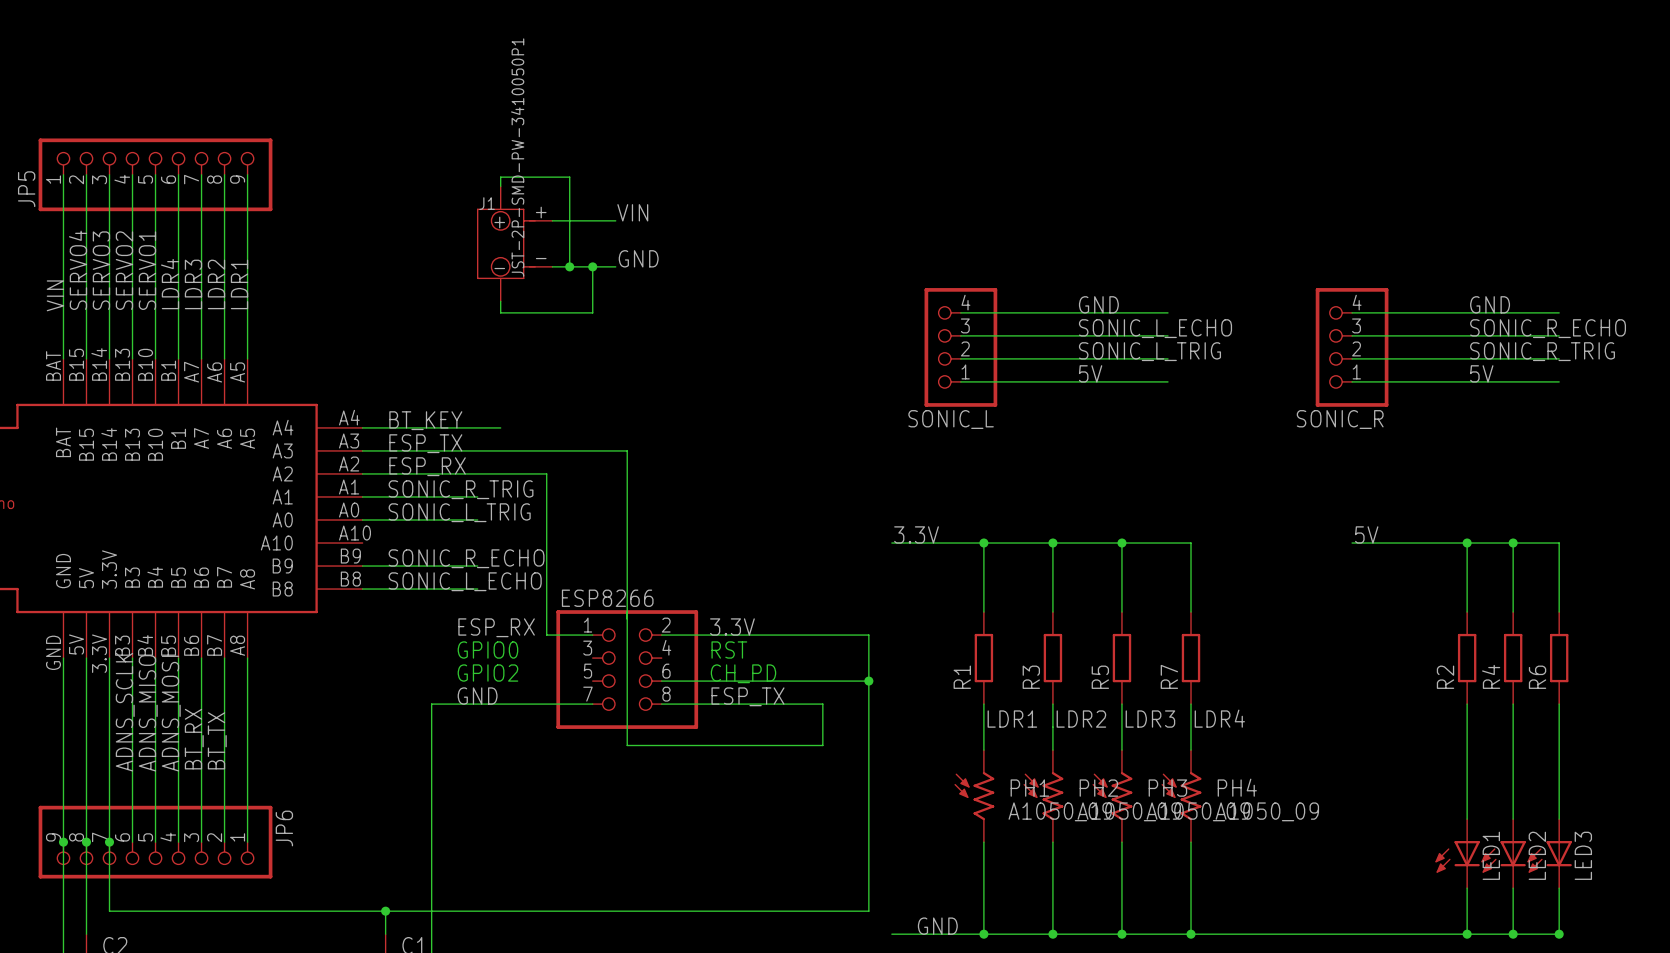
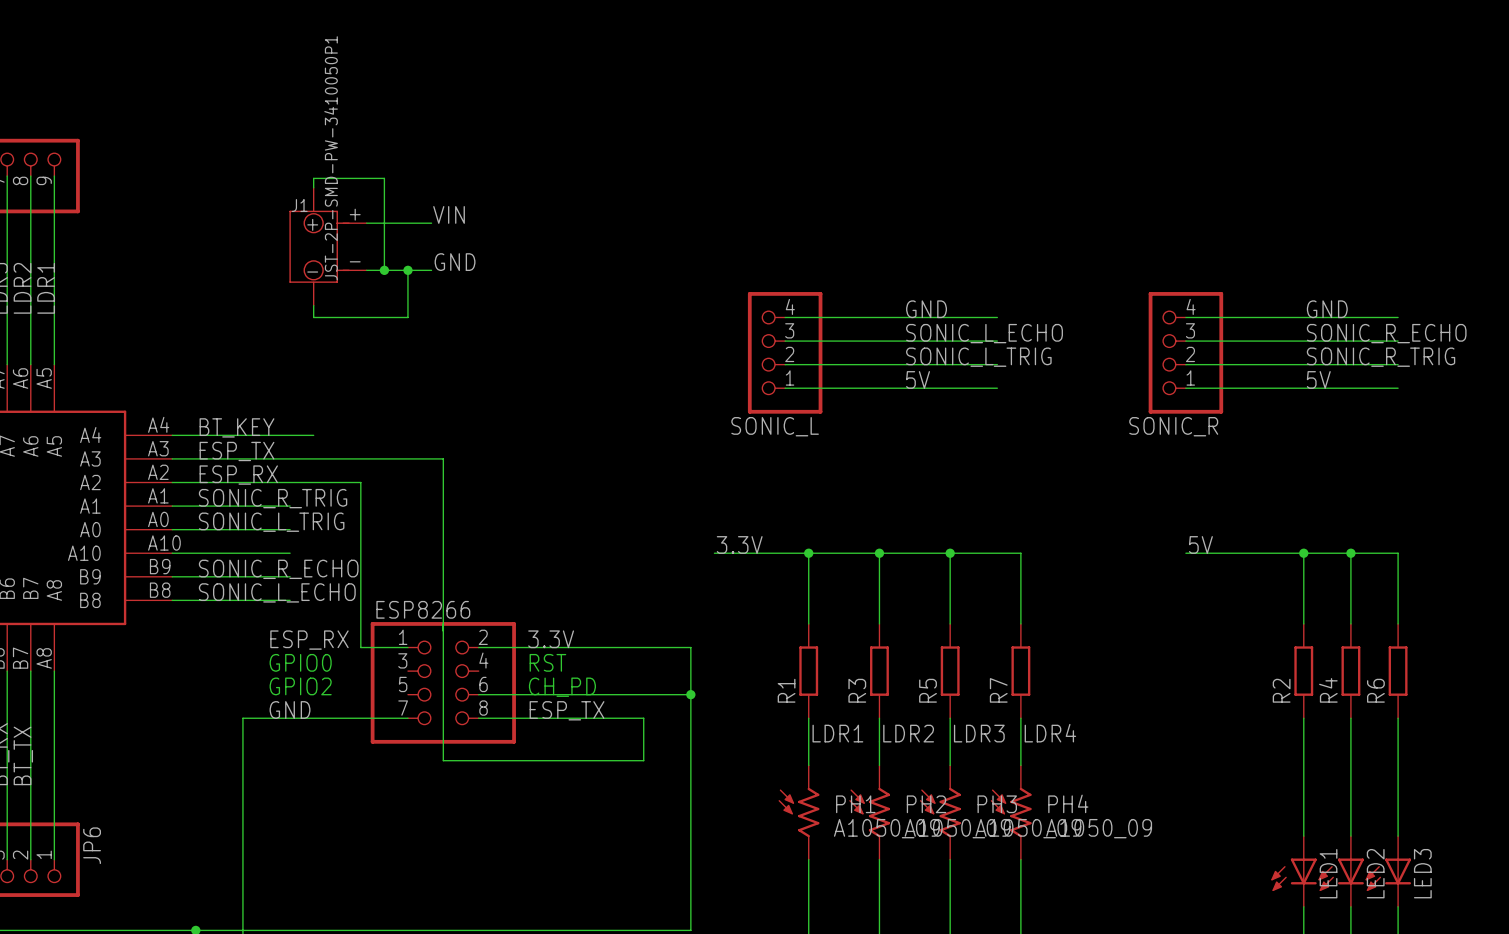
wire: none -> (172, 553) (290, 553)

